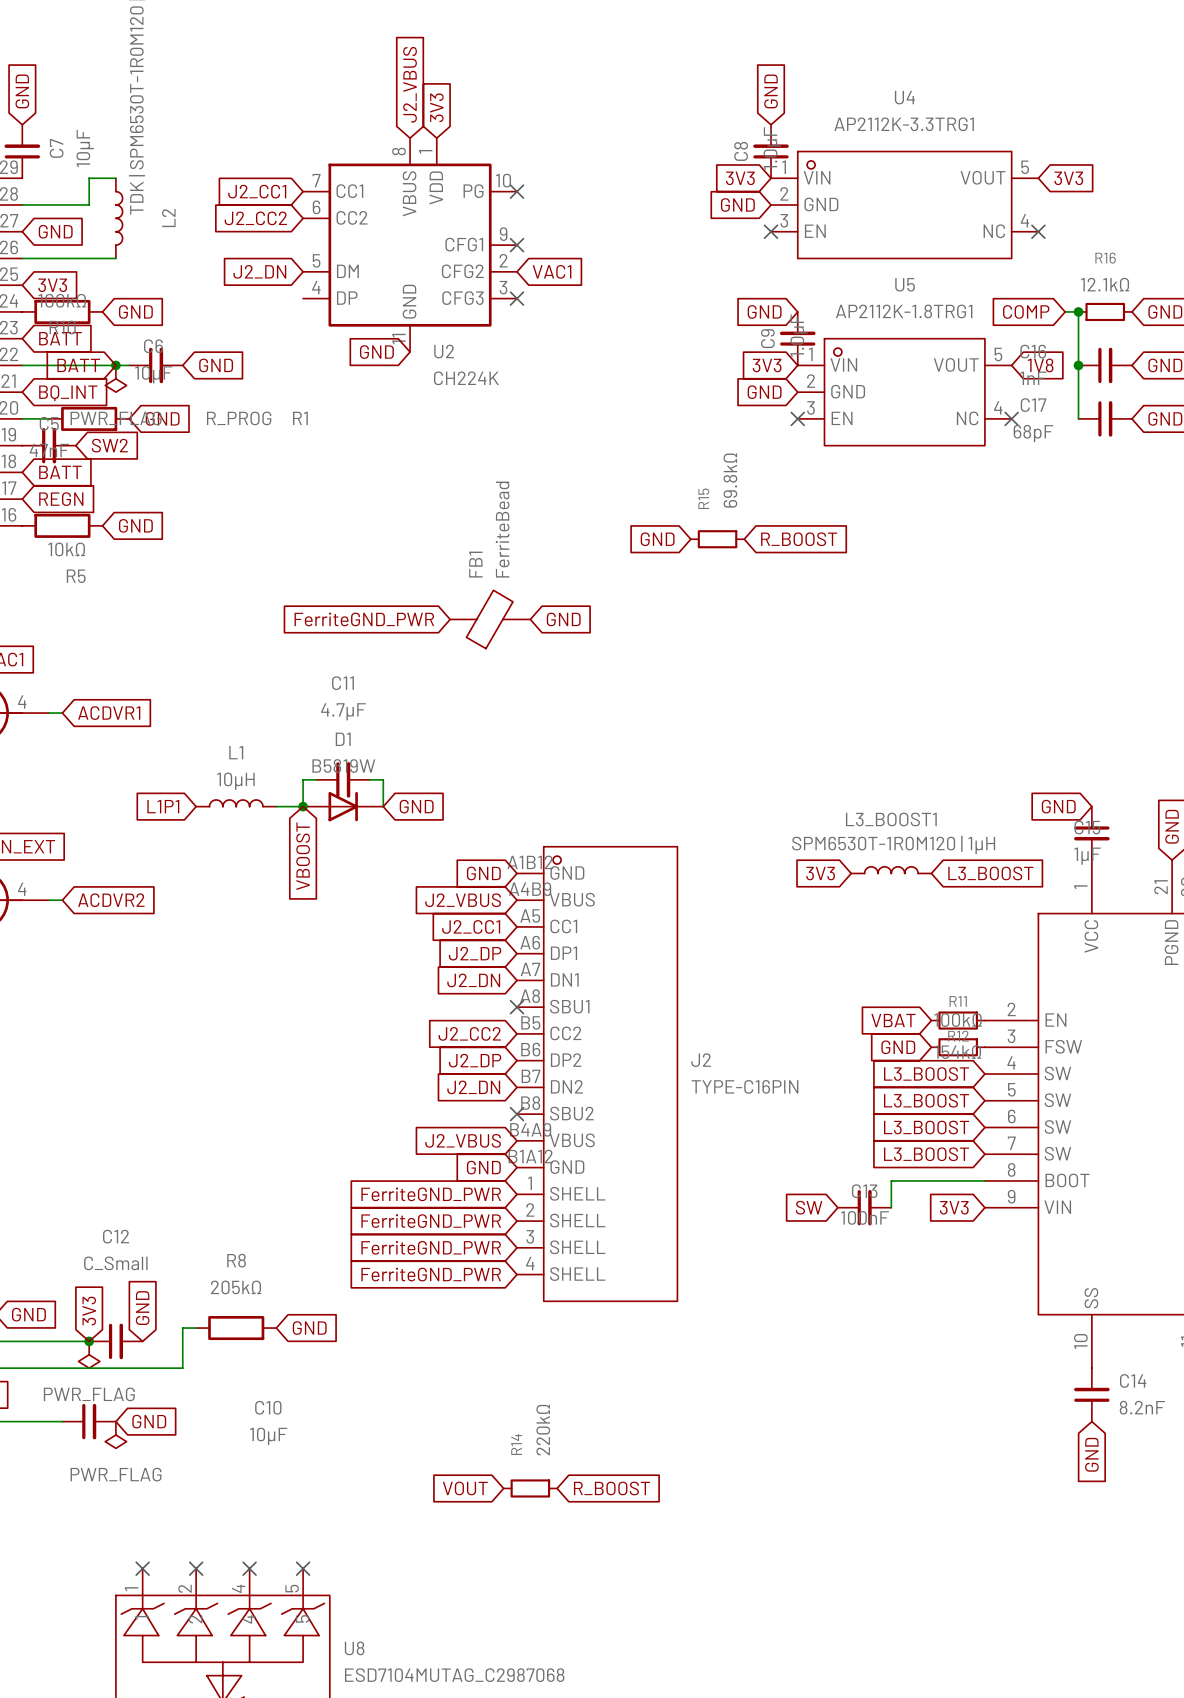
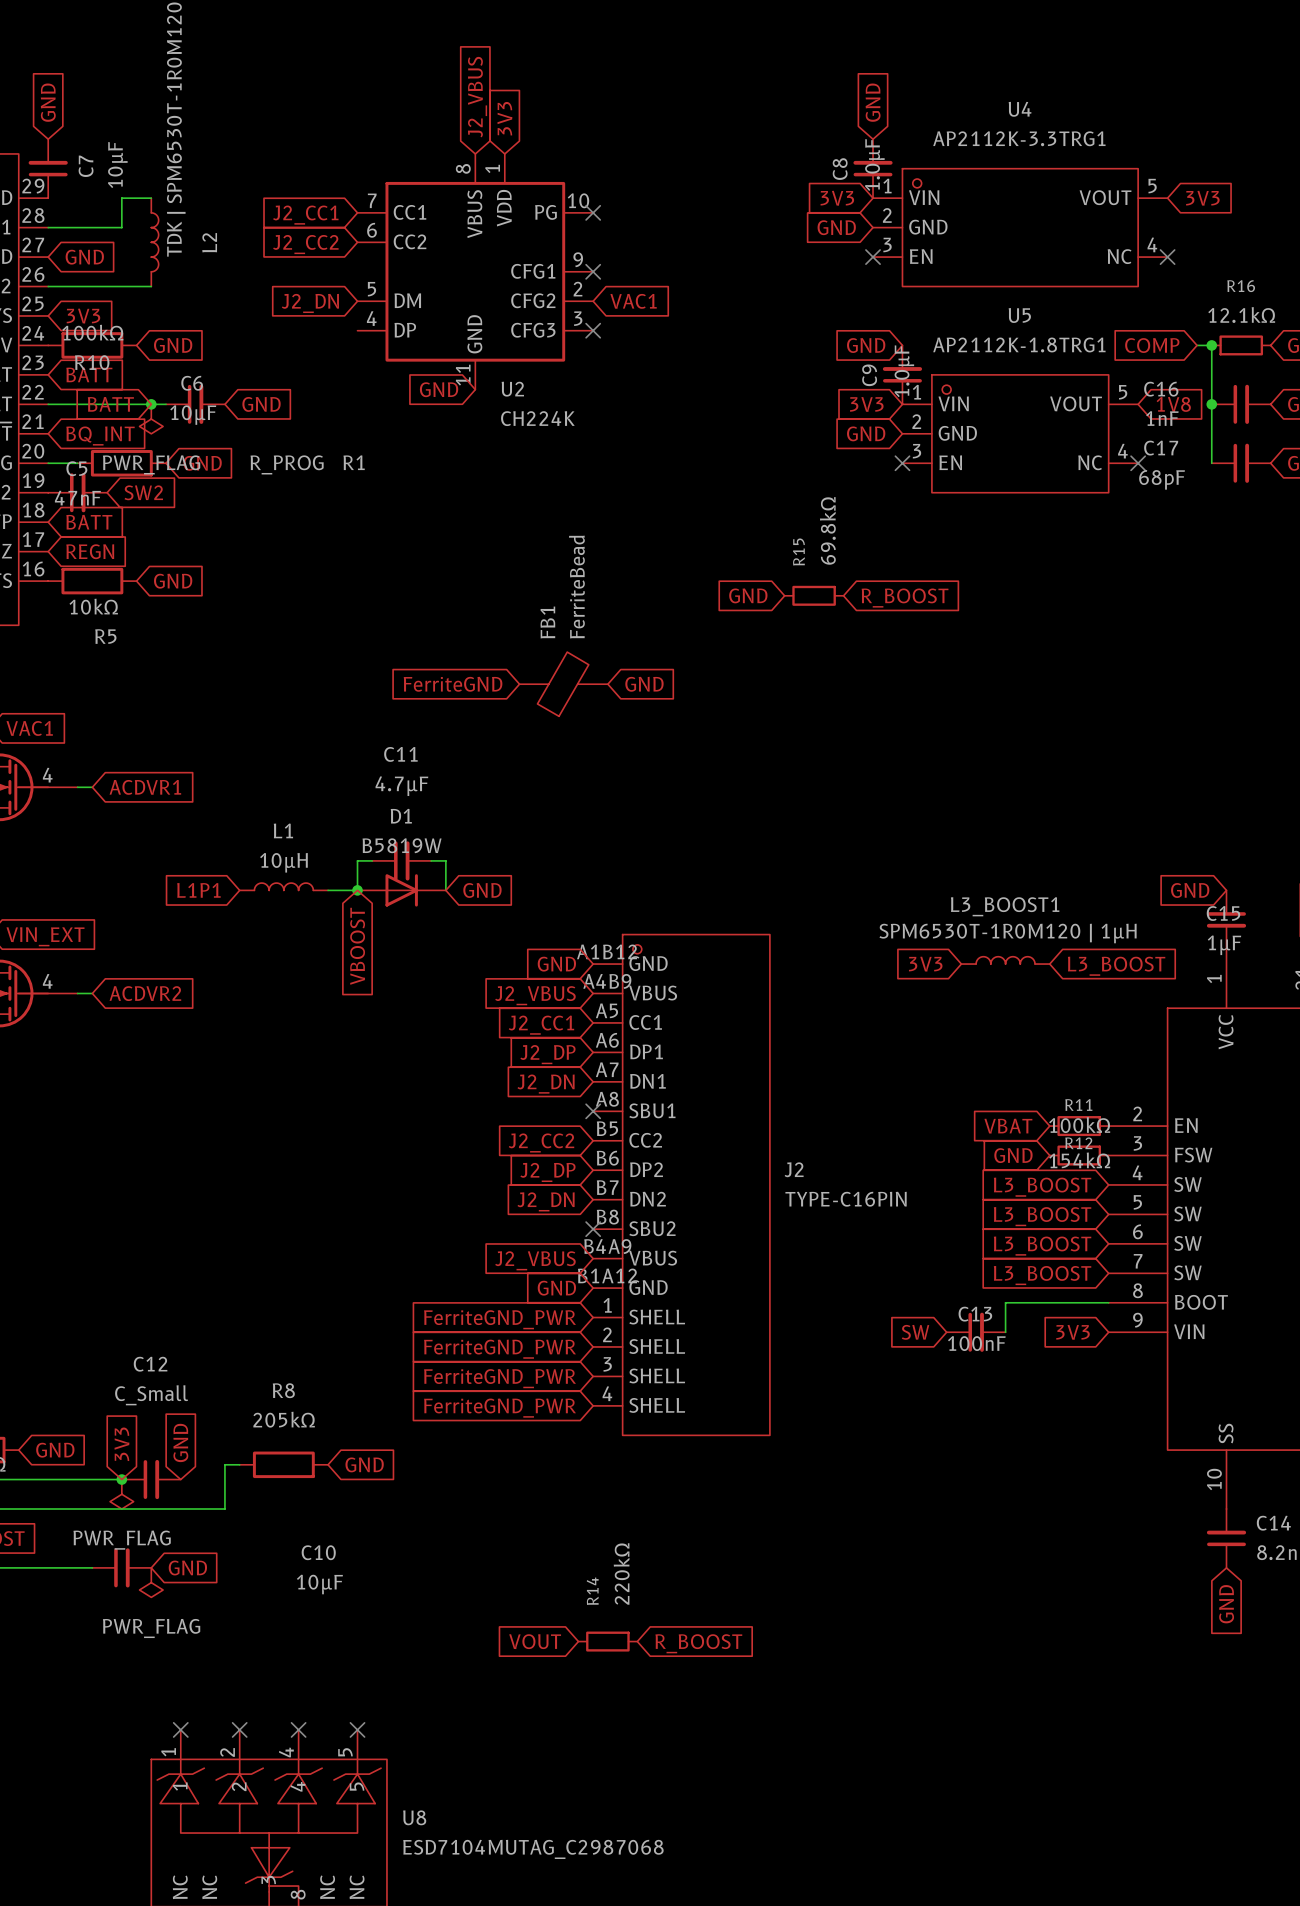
global label: FerriteGND_PWR (364, 619) -> FerriteGND (453, 684)

